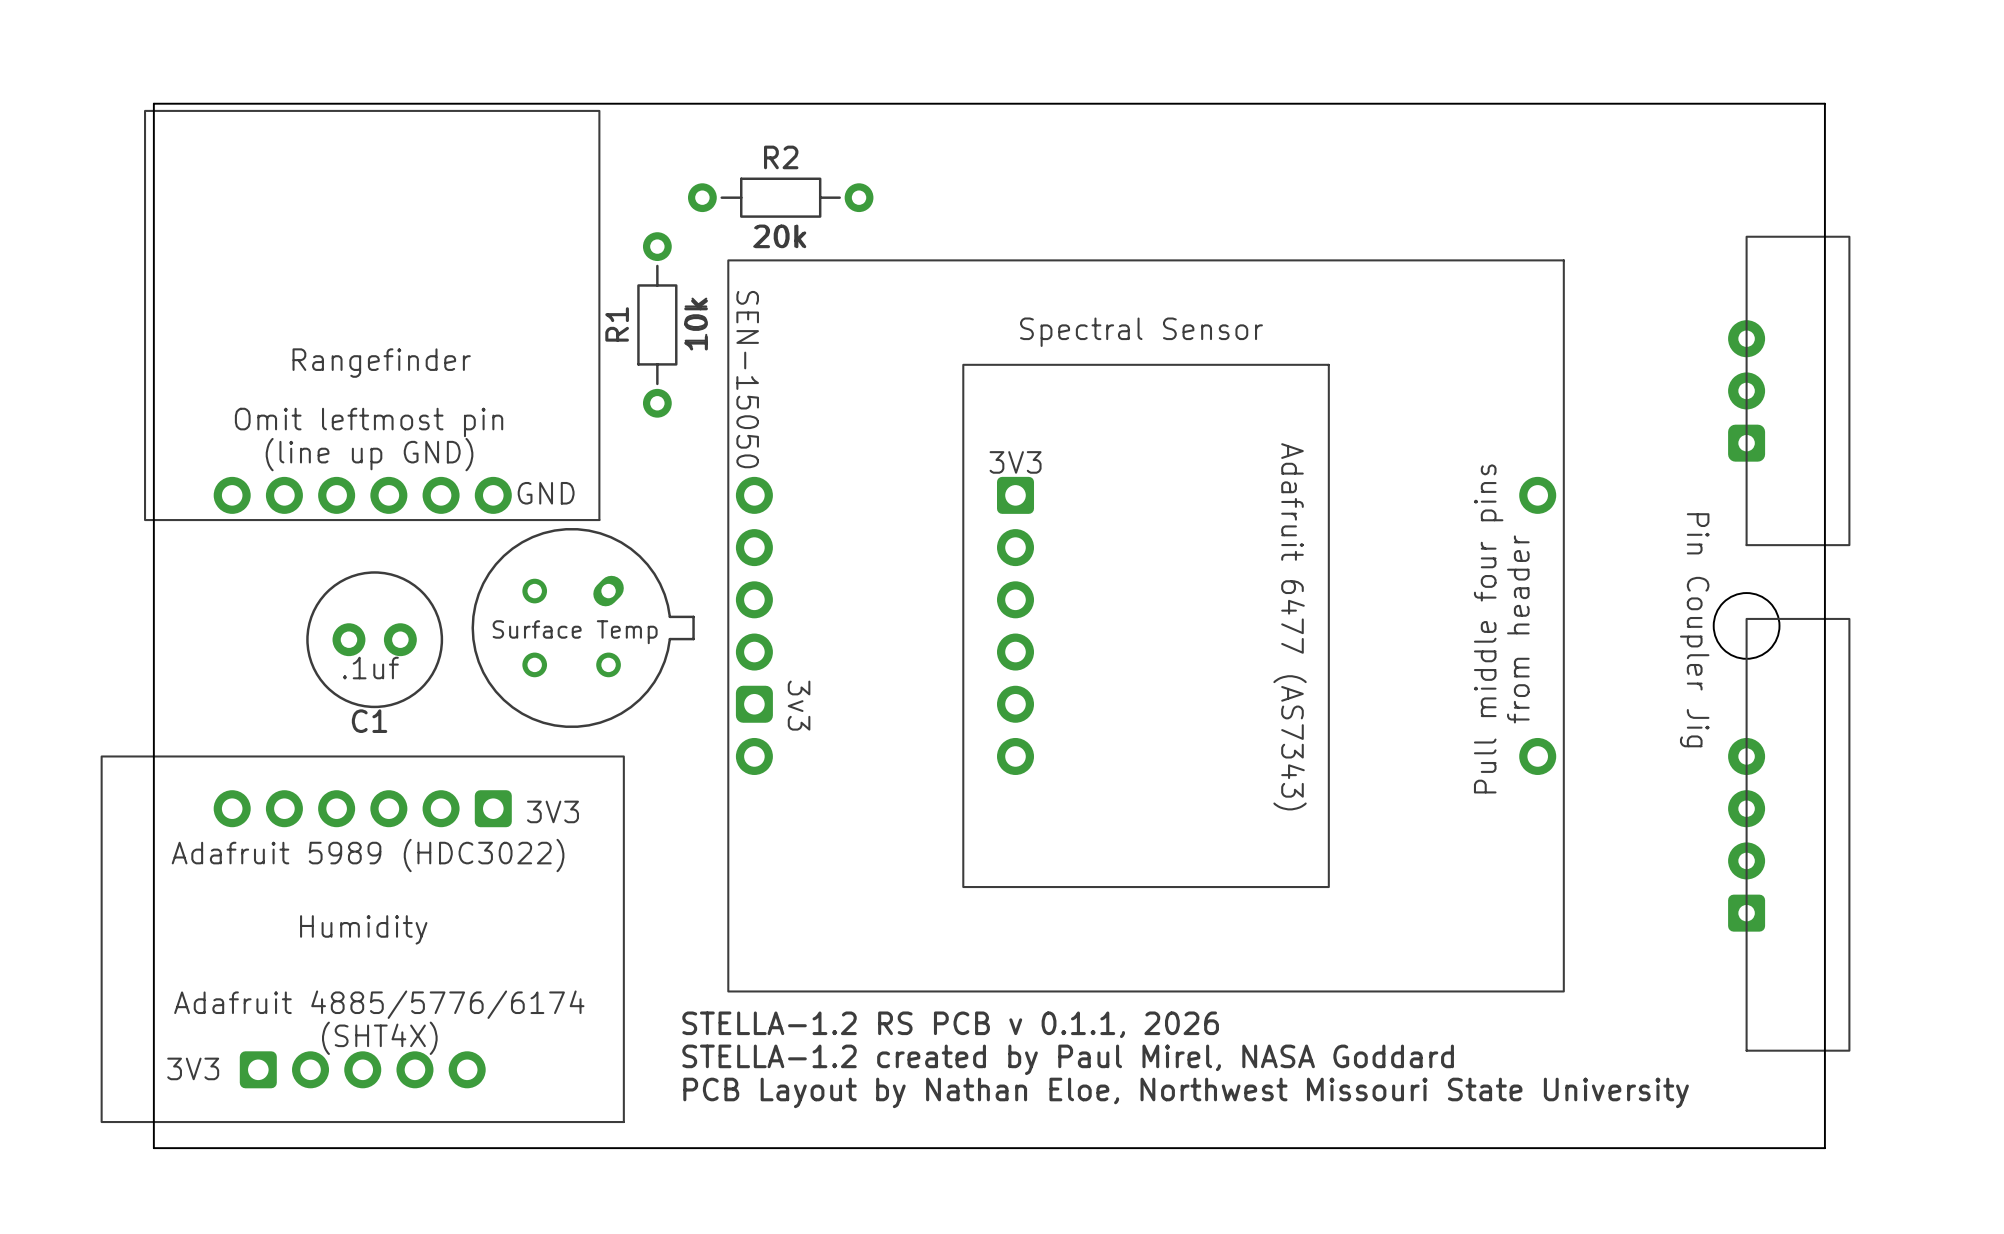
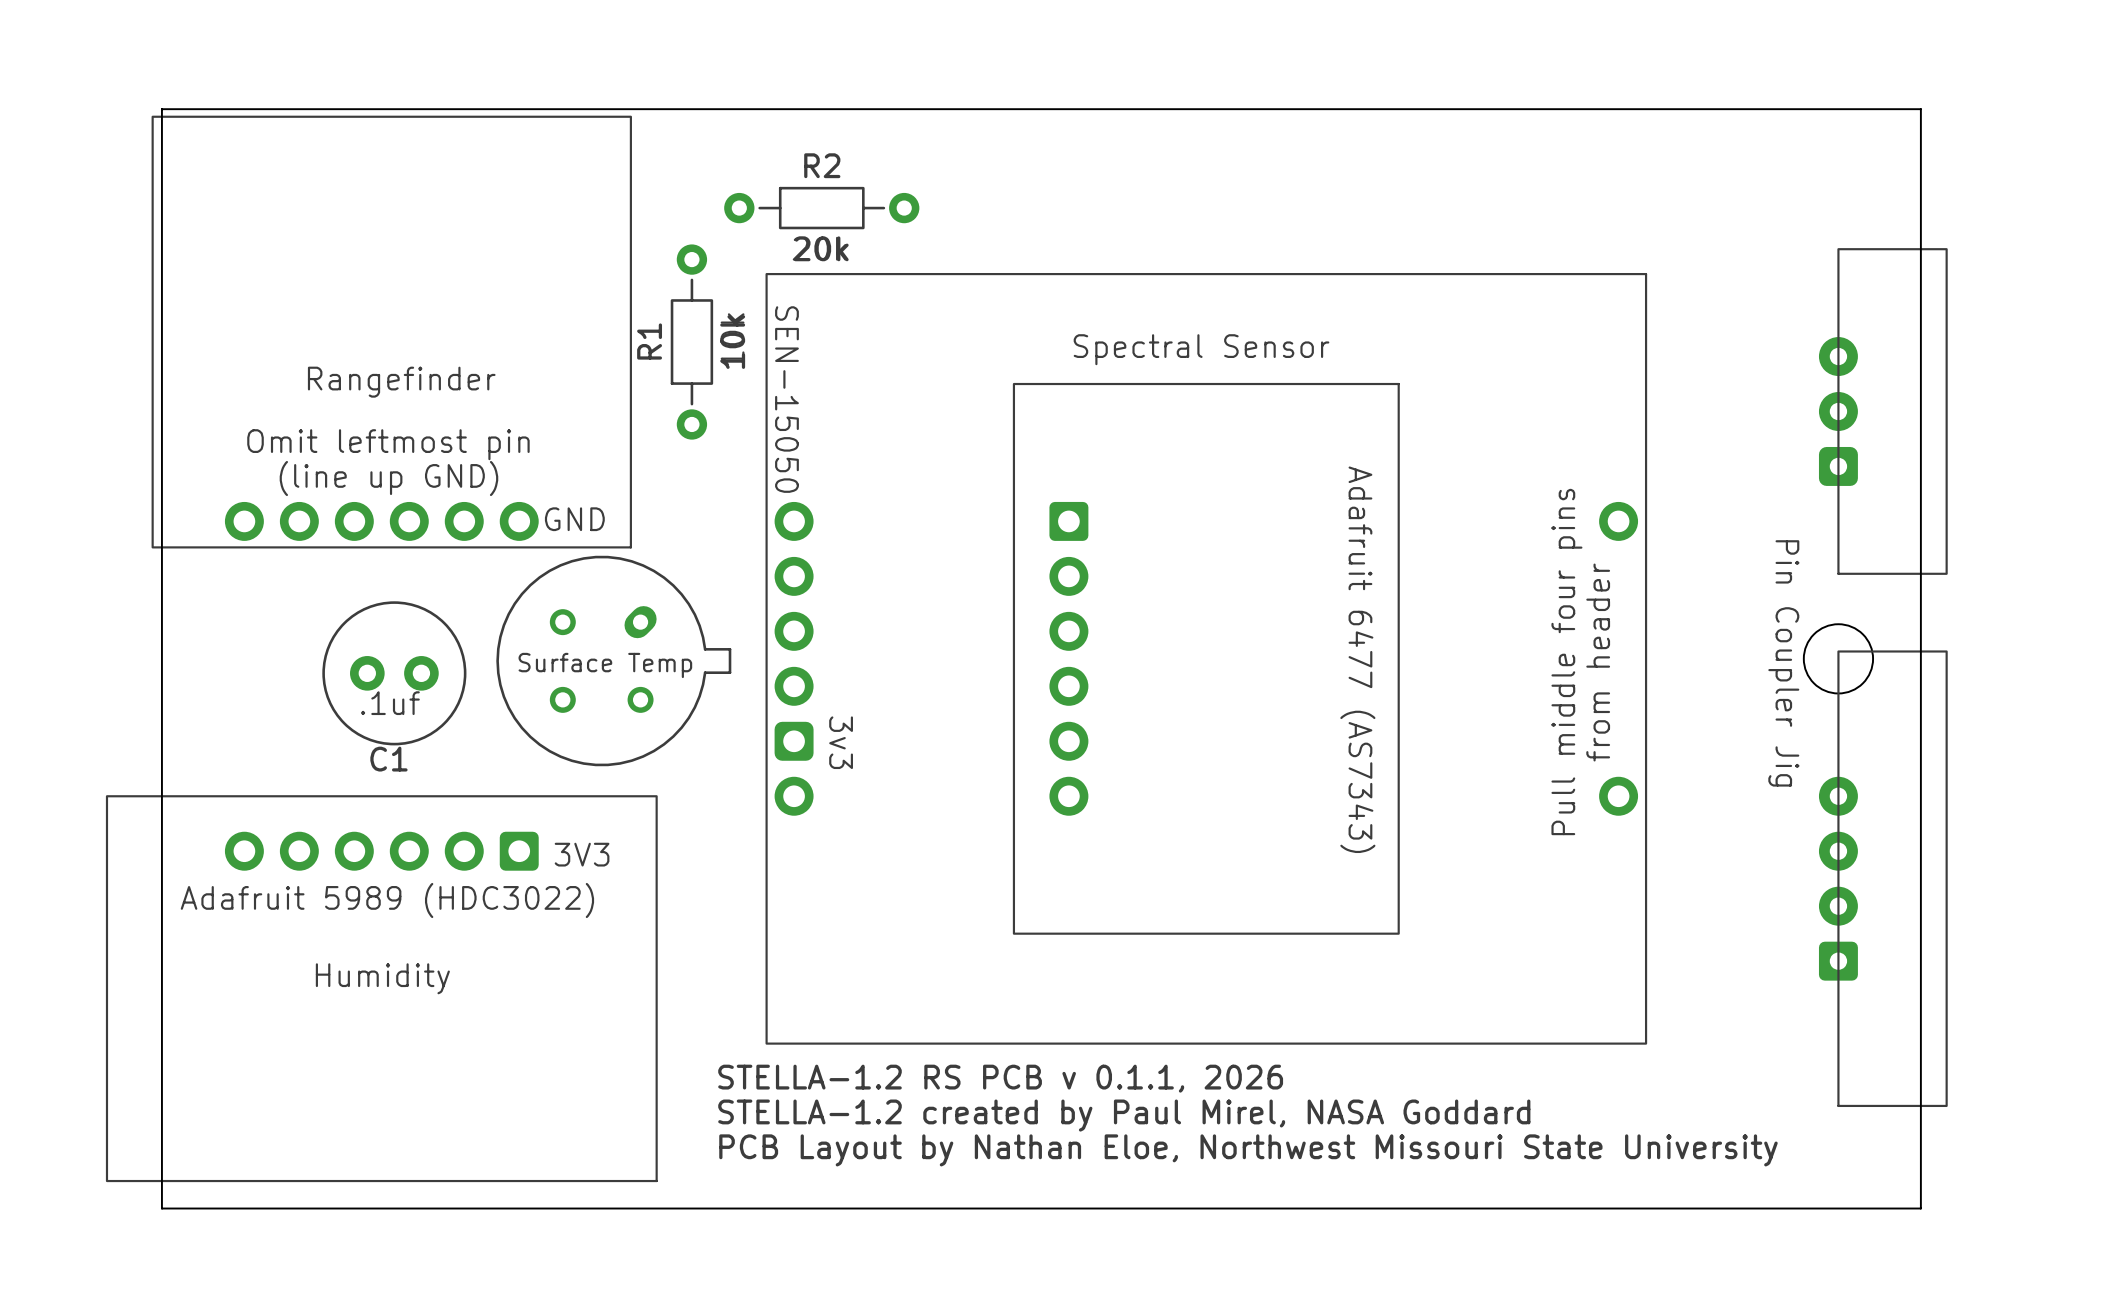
text: 3V3 (1015, 462) -> none
part footprint: [100, 755, 625, 1124] -> [105, 795, 658, 1183]
text: Adafruit 4885/5776/6174 (379, 1004) -> none
text: (SHT4X) (379, 1038) -> none
text: 3V3 (193, 1068) -> none

